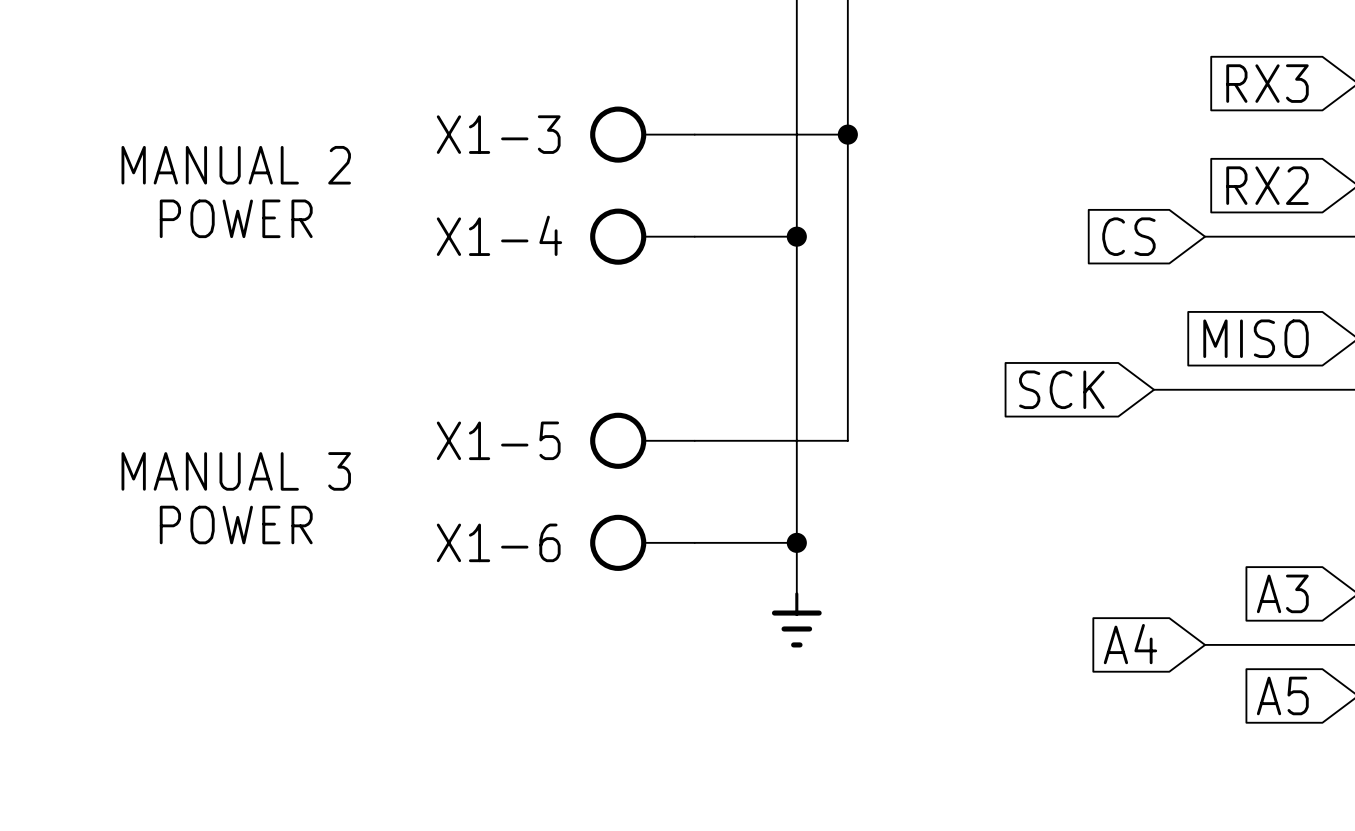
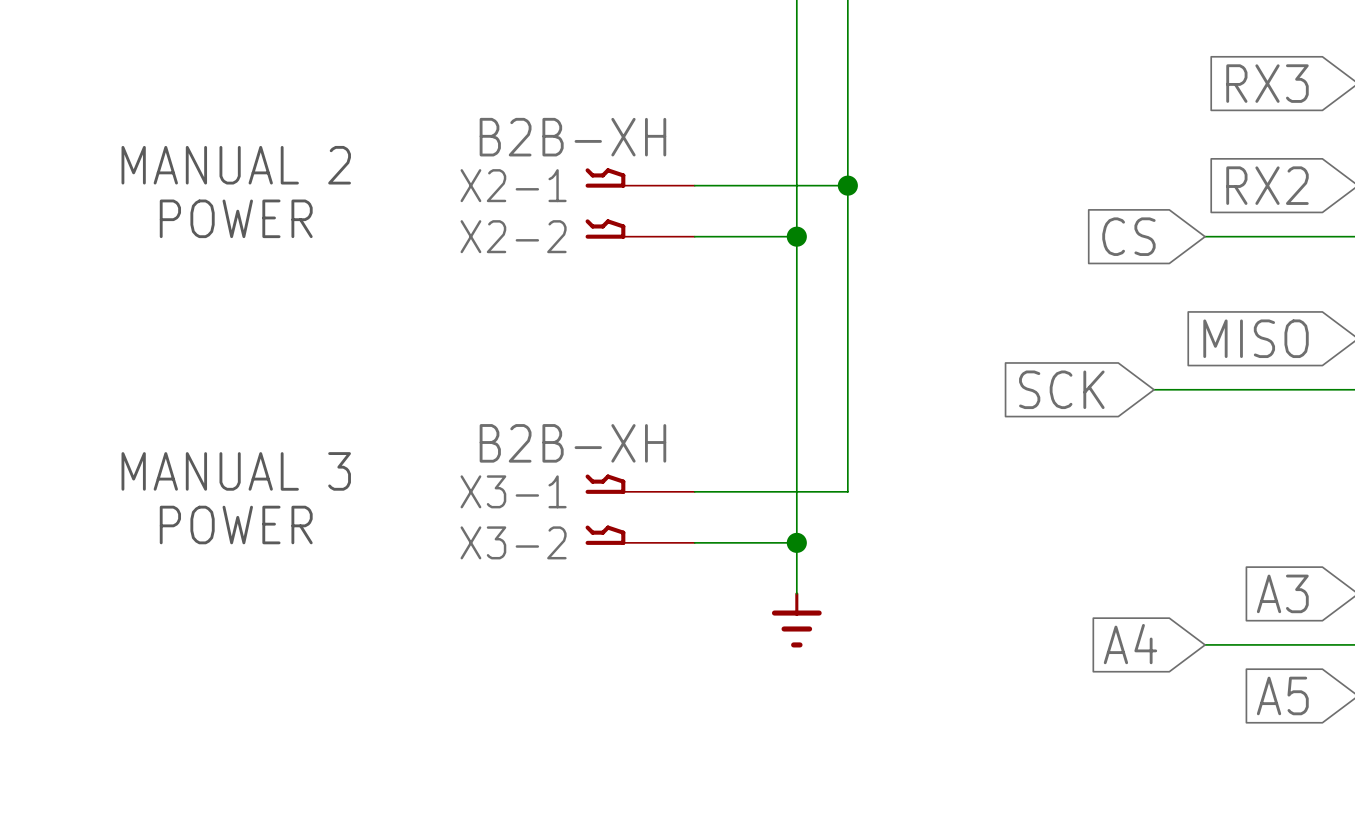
X1-3: (642, 134) -> none
wire: (694, 134) (847, 134) -> (694, 185) (847, 185)
junction position: (847, 134) -> (847, 185)
X2-1: none -> B2B-XH (640, 177)
X2-2: none -> (640, 229)
X1-4: (642, 236) -> none
X1-5: (642, 440) -> none
wire: (694, 440) (847, 440) -> (694, 491) (847, 491) (847, 440)
X3-1: none -> B2B-XH (640, 484)
X3-2: none -> (640, 535)
X1-6: (642, 542) -> none

